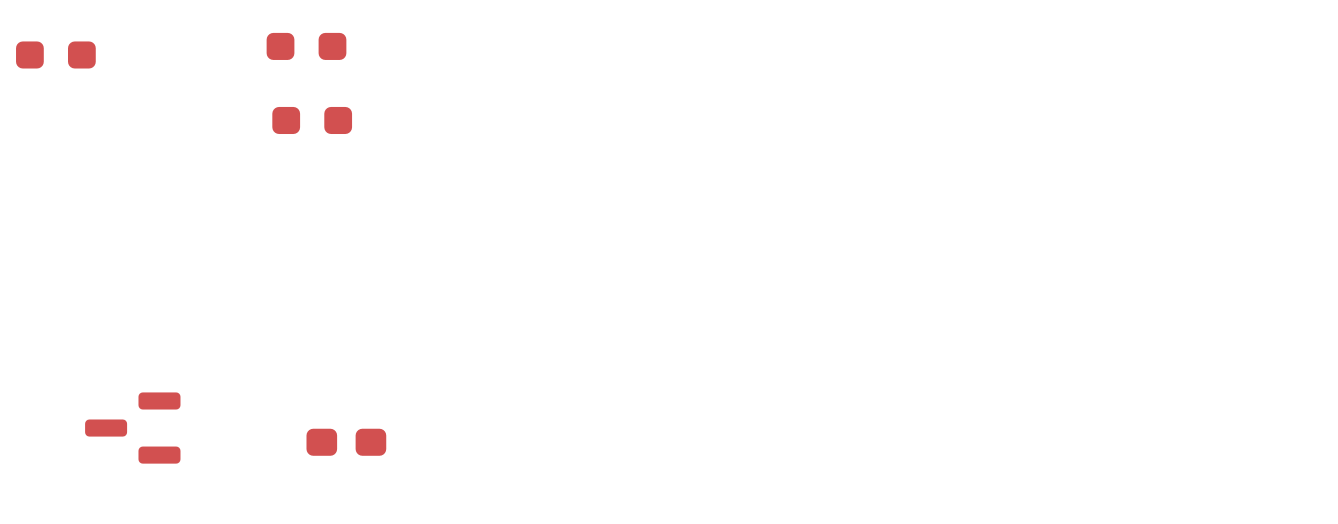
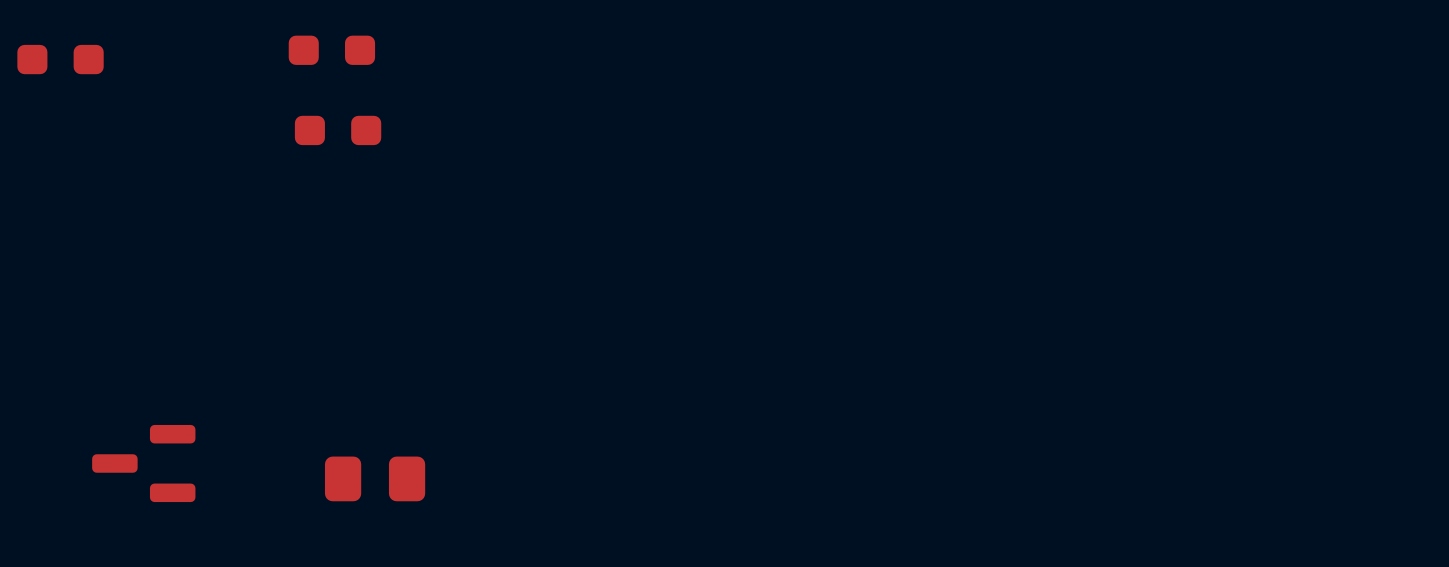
part footprint: [306, 428, 387, 456] -> [324, 456, 426, 502]

